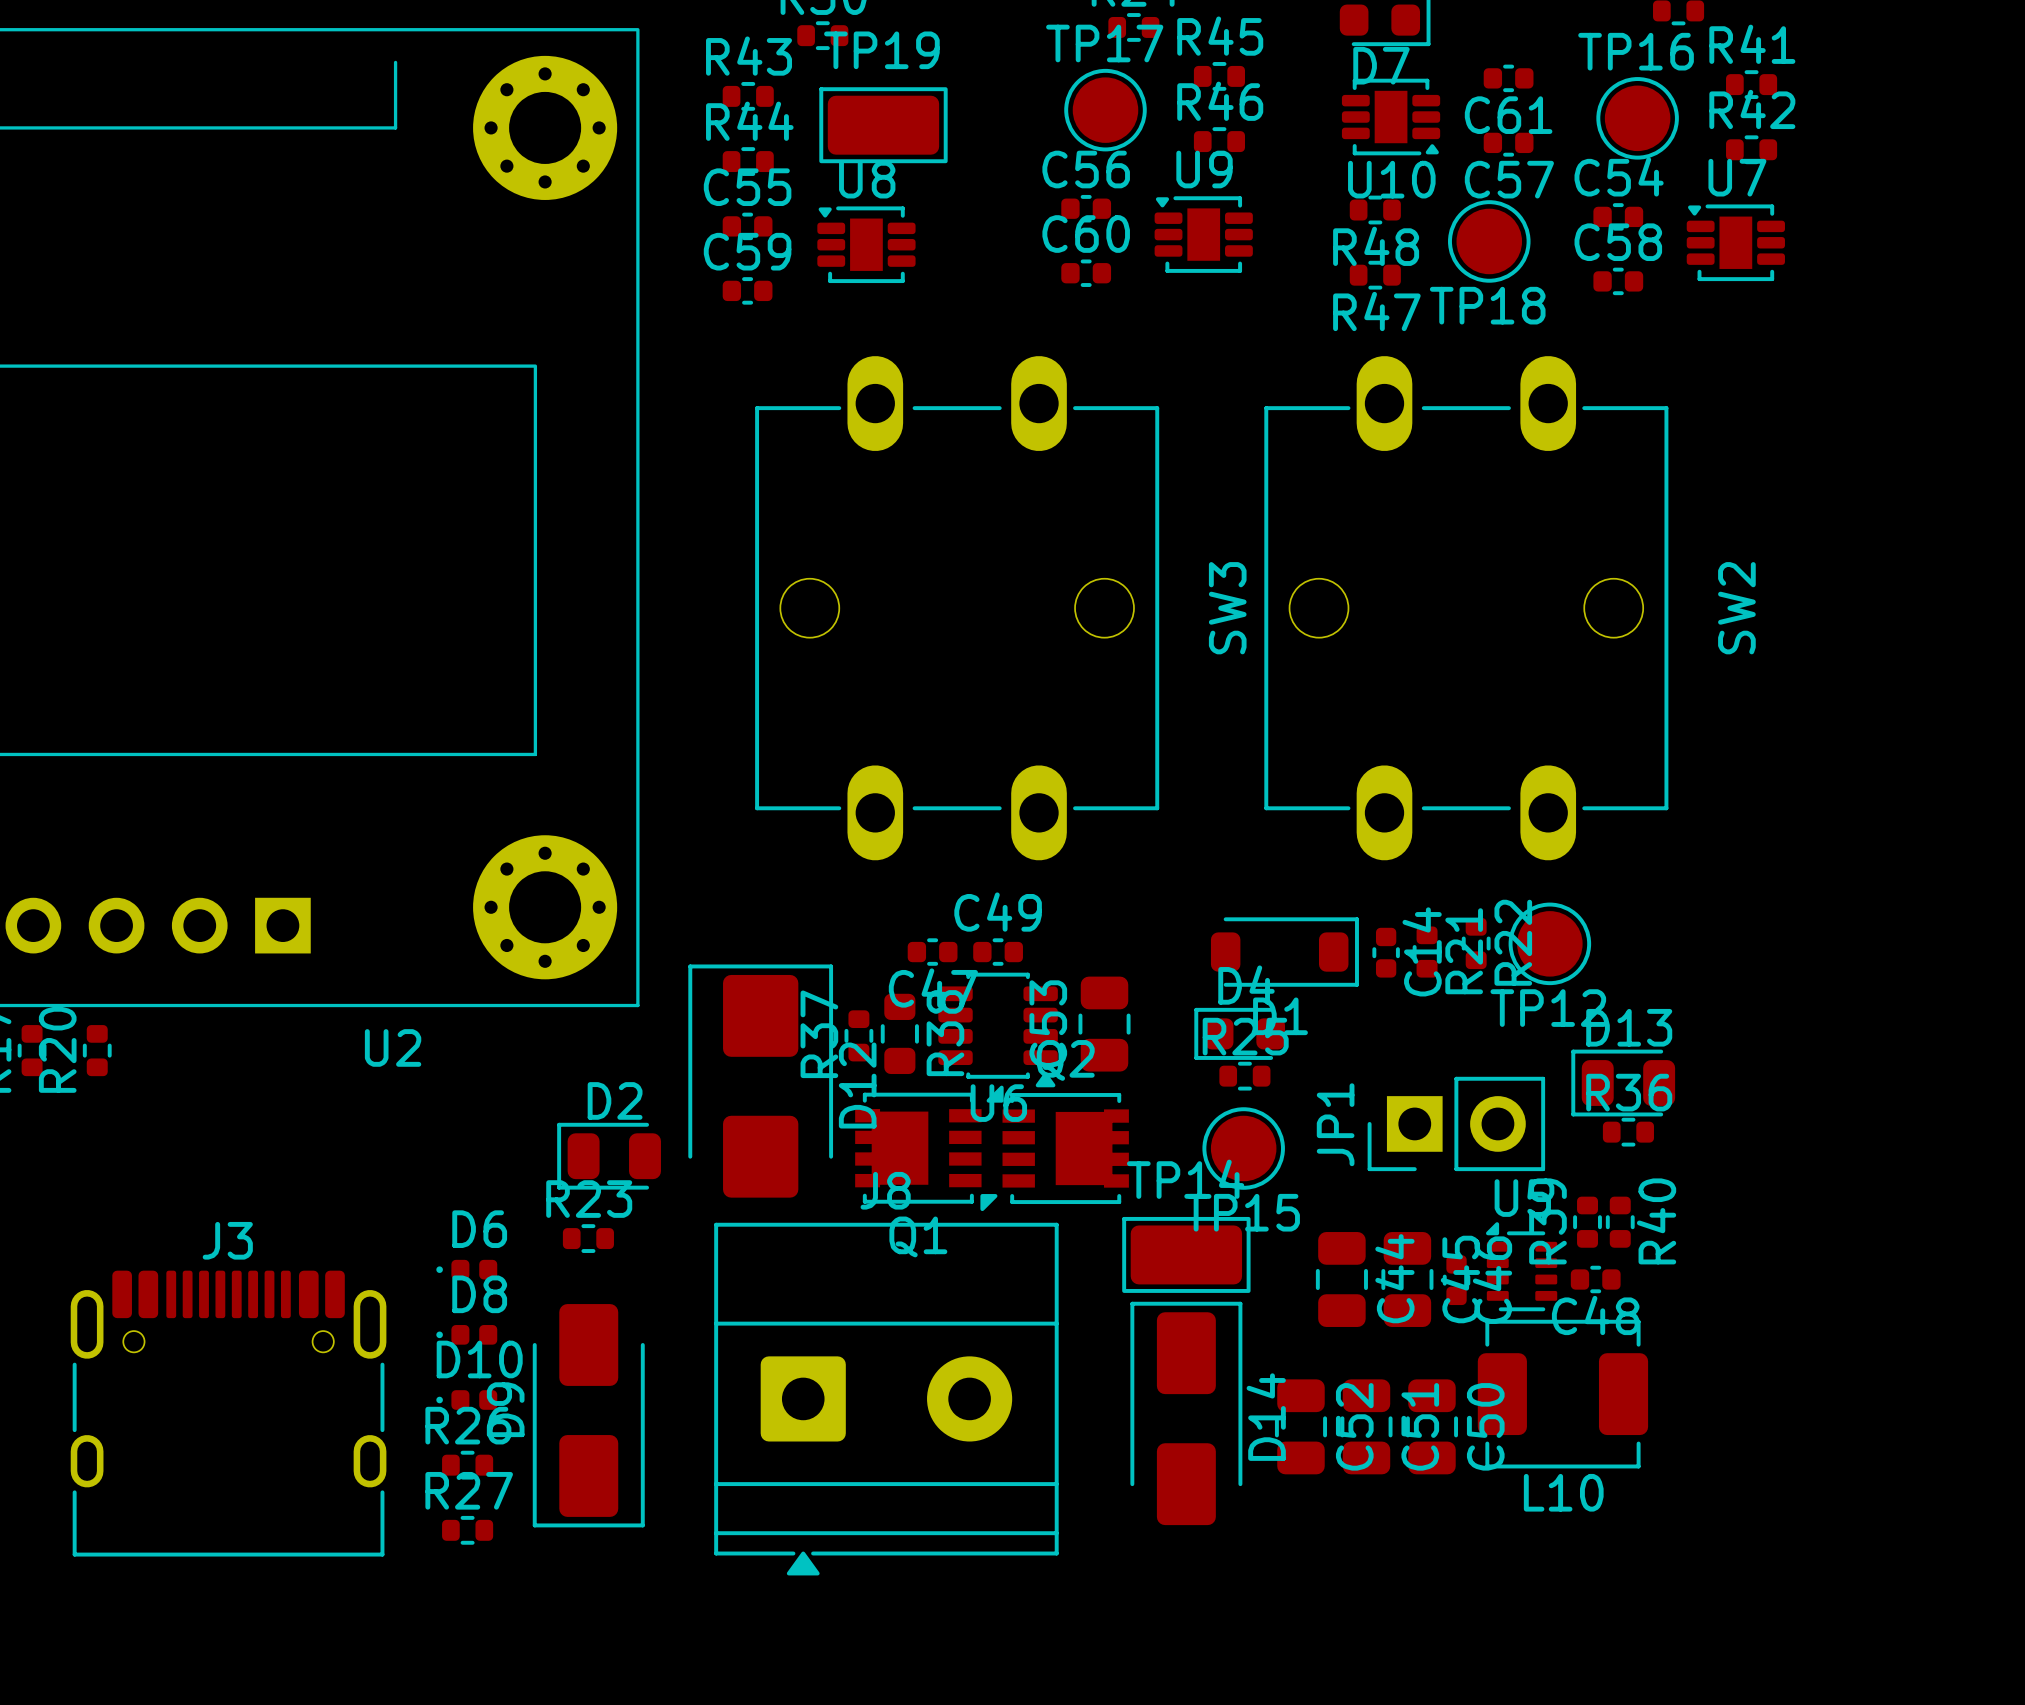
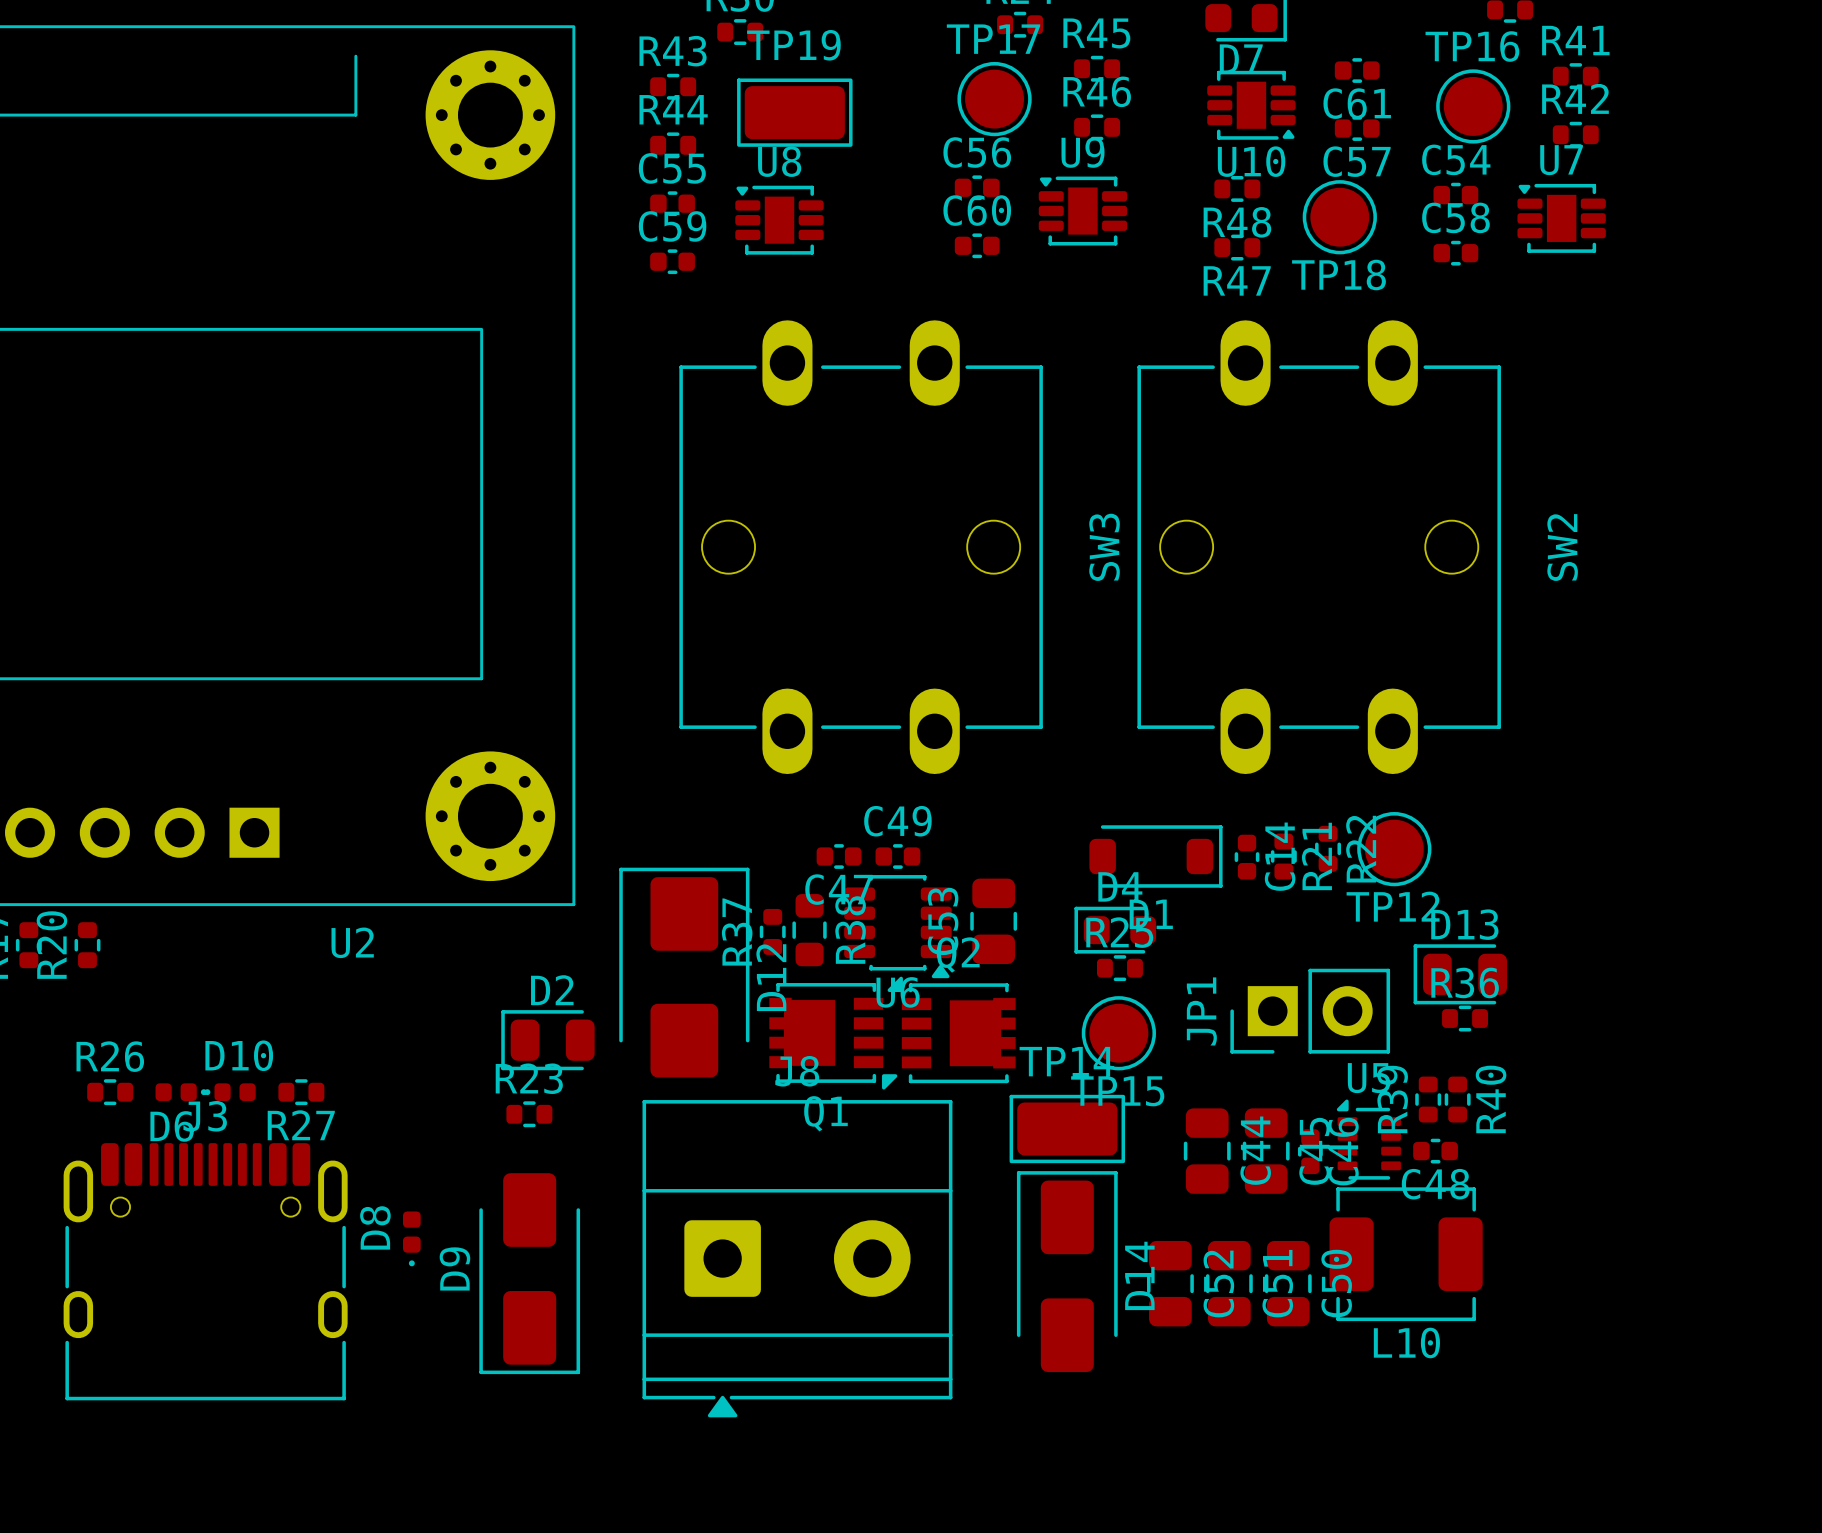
D6 rotation: 0° (466, 1269) -> 180° (182, 1092)
D6 position: (466, 1269) -> (182, 1092)
D8 rotation: 0° (466, 1334) -> 90° counterclockwise (411, 1238)
D8 position: (466, 1334) -> (411, 1238)
D10 position: (466, 1400) -> (228, 1092)
R26 position: (467, 1465) -> (110, 1092)
R27 name position: R27 (469, 1490) -> R27 (301, 1125)
R27 position: (467, 1530) -> (301, 1092)

